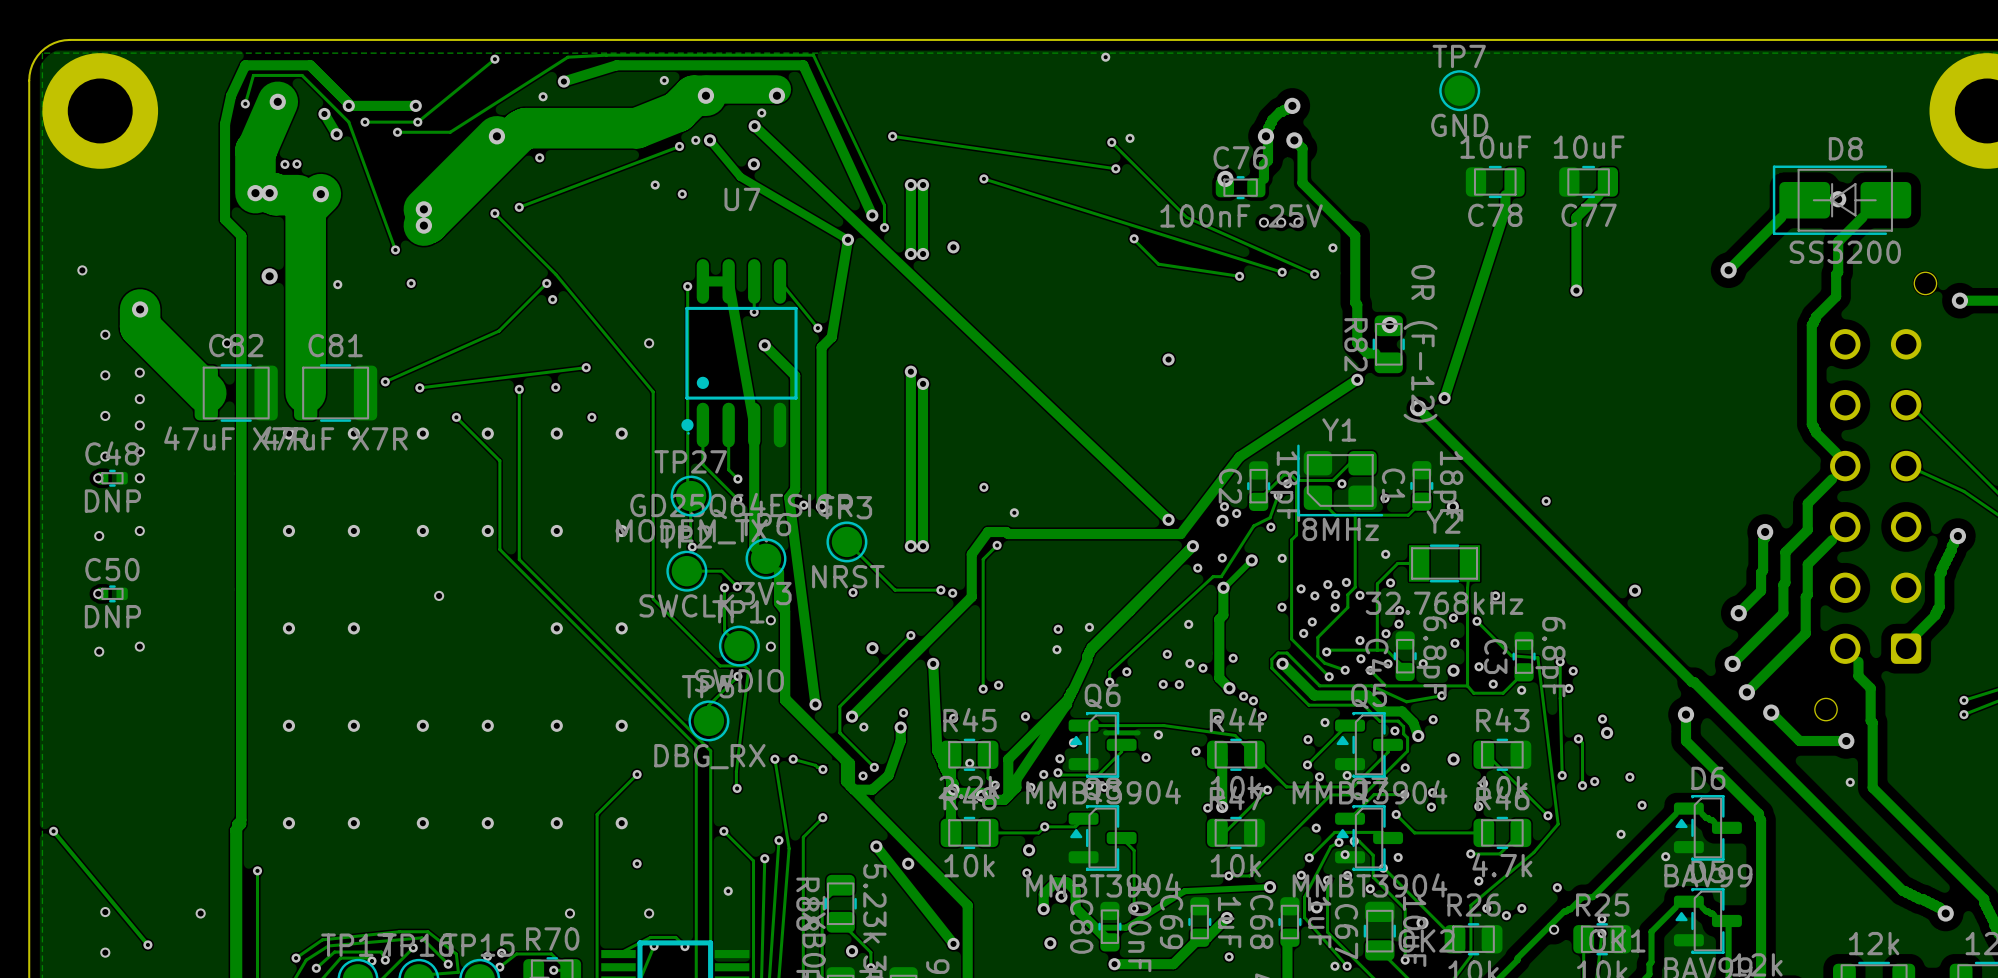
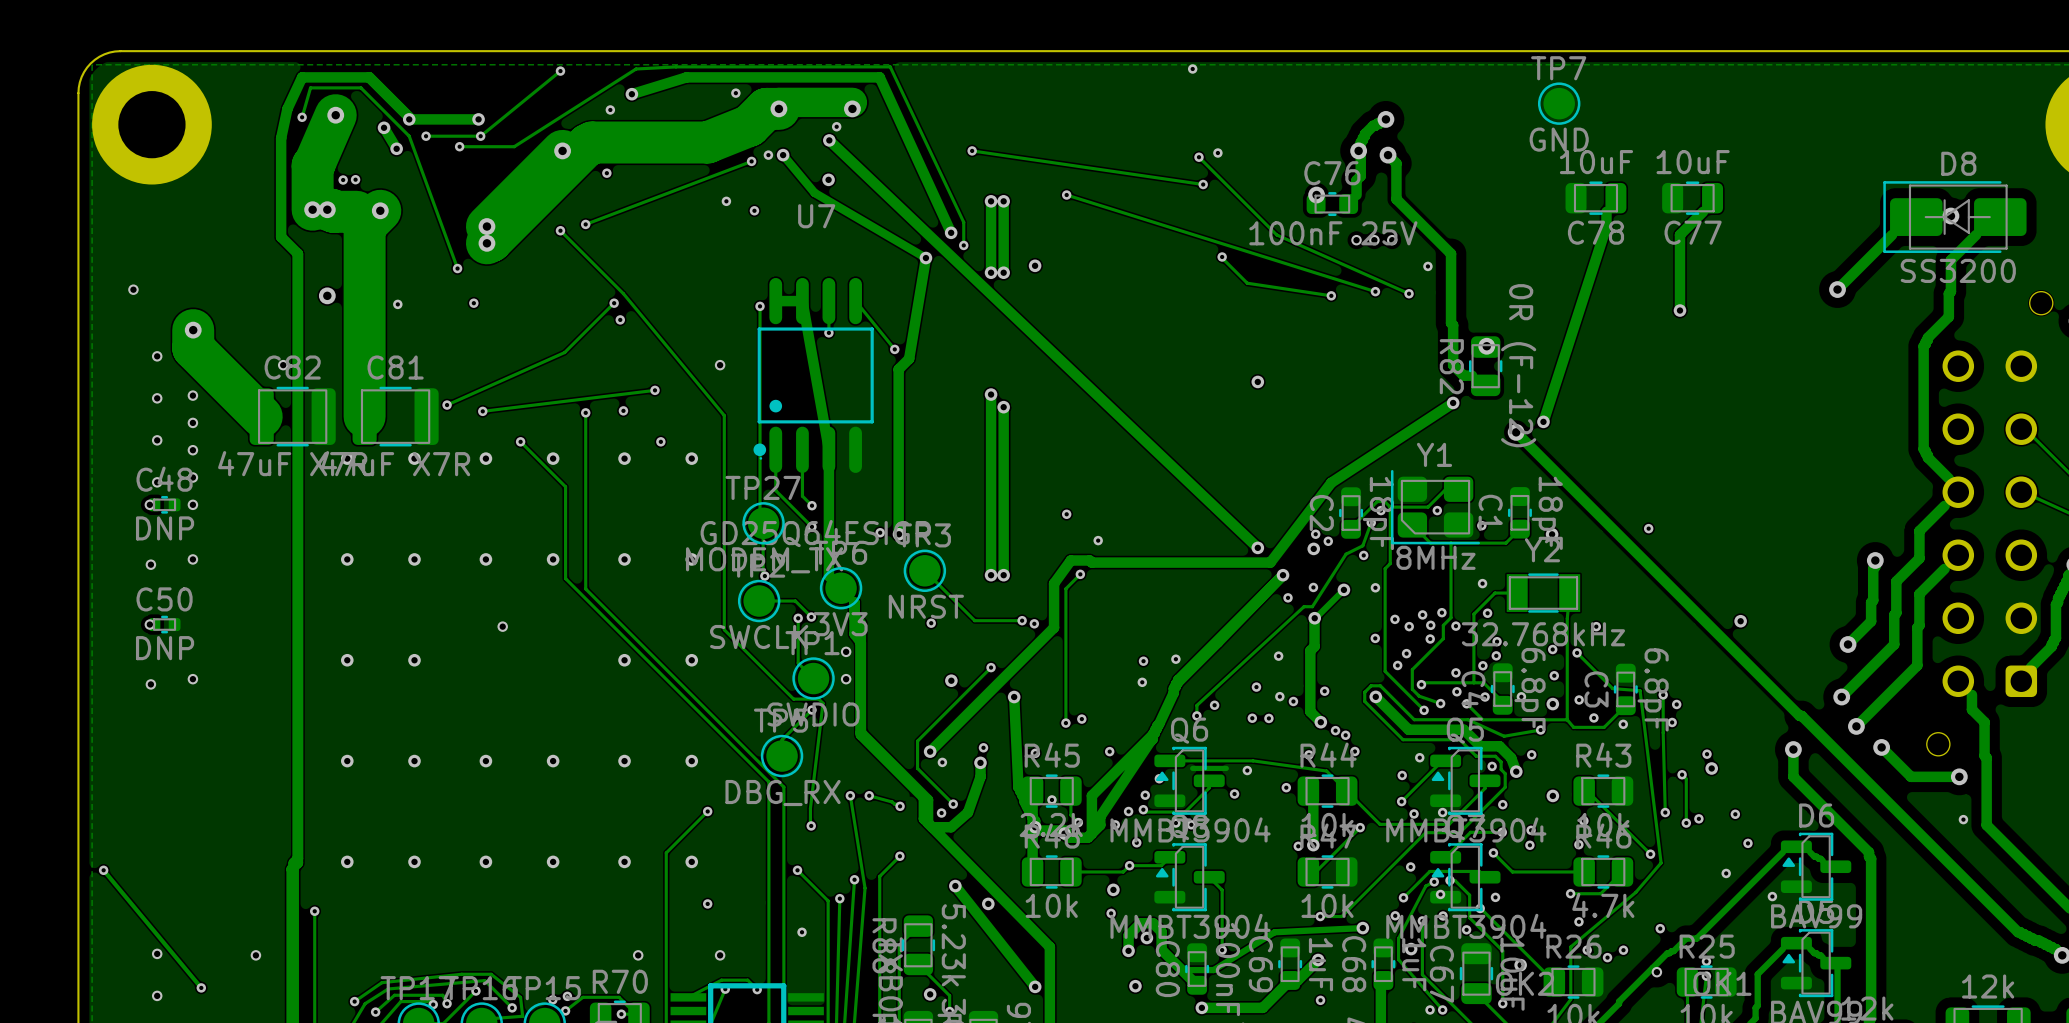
track: (764, 345) (795, 375) (795, 489) (789, 497) (815, 704) -> none
via: (764, 345) -> none
via: (815, 704) -> none

